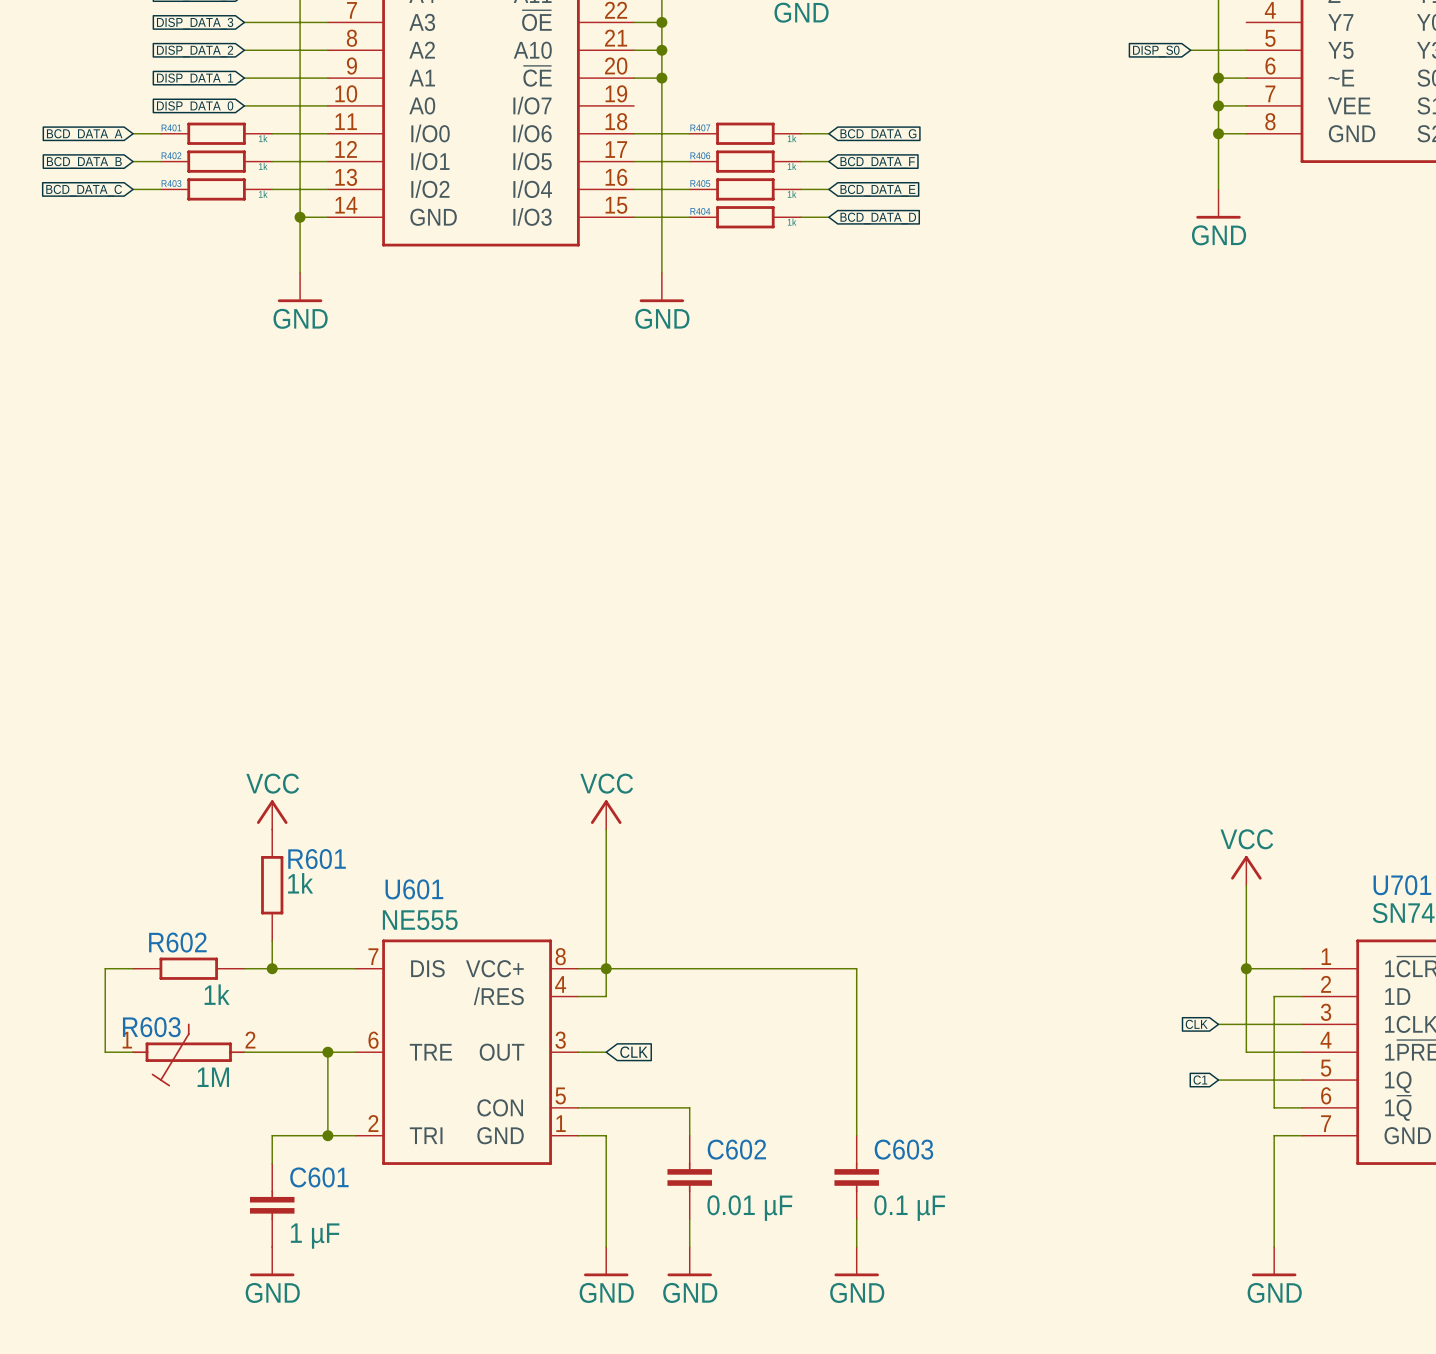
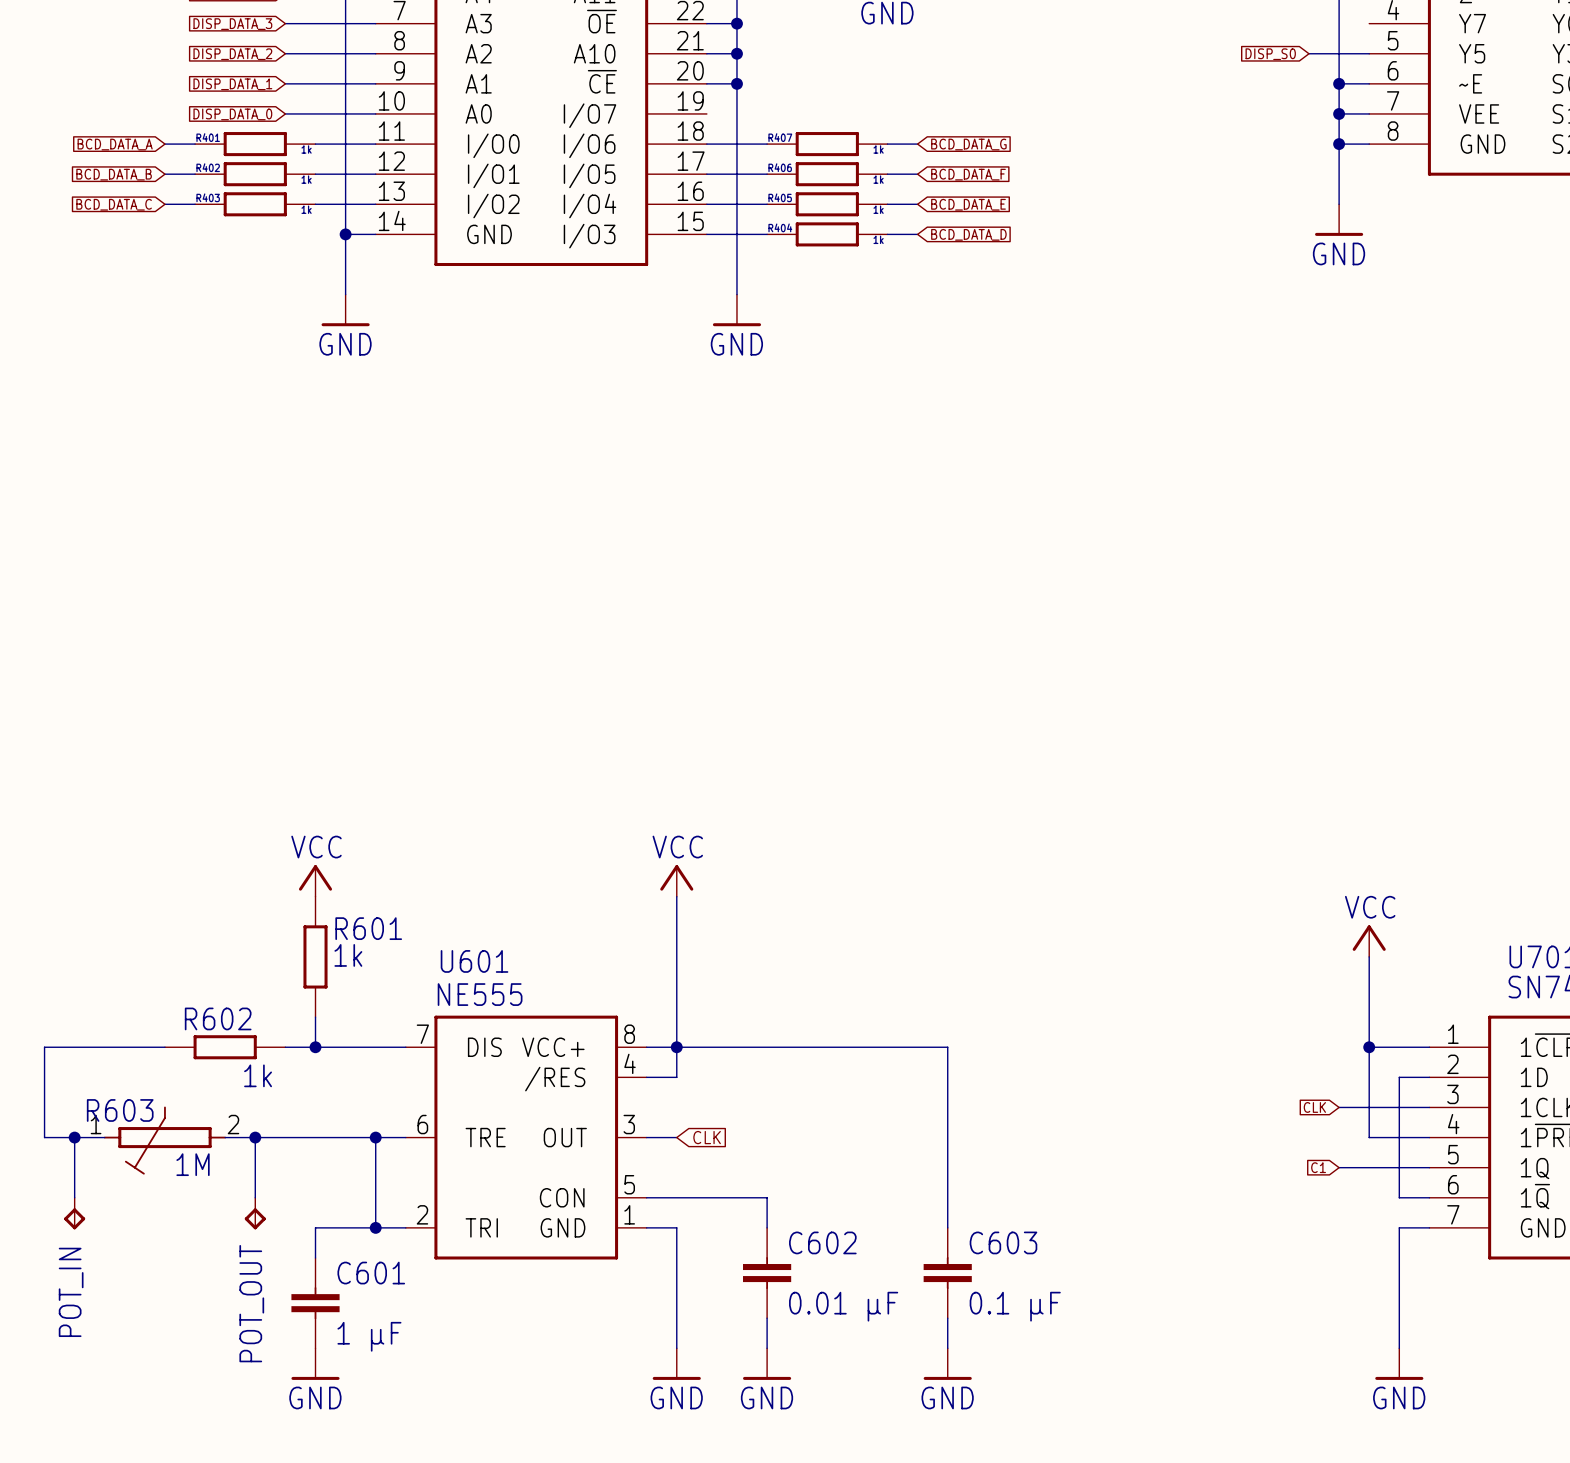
wire: (105, 968) (105, 1052) (133, 1052) -> (134, 1047) (44, 1047) (44, 1137) (104, 1137)
wire: none -> (74, 1137) (74, 1197)
junction: none -> (74, 1137)
wire: none -> (225, 1137) (285, 1137)
wire: none -> (255, 1137) (255, 1197)
junction: none -> (255, 1137)
R603 position: (188, 1054) -> (164, 1140)
POT_IN: none -> (74, 1213)
POT_OUT: none -> (255, 1213)

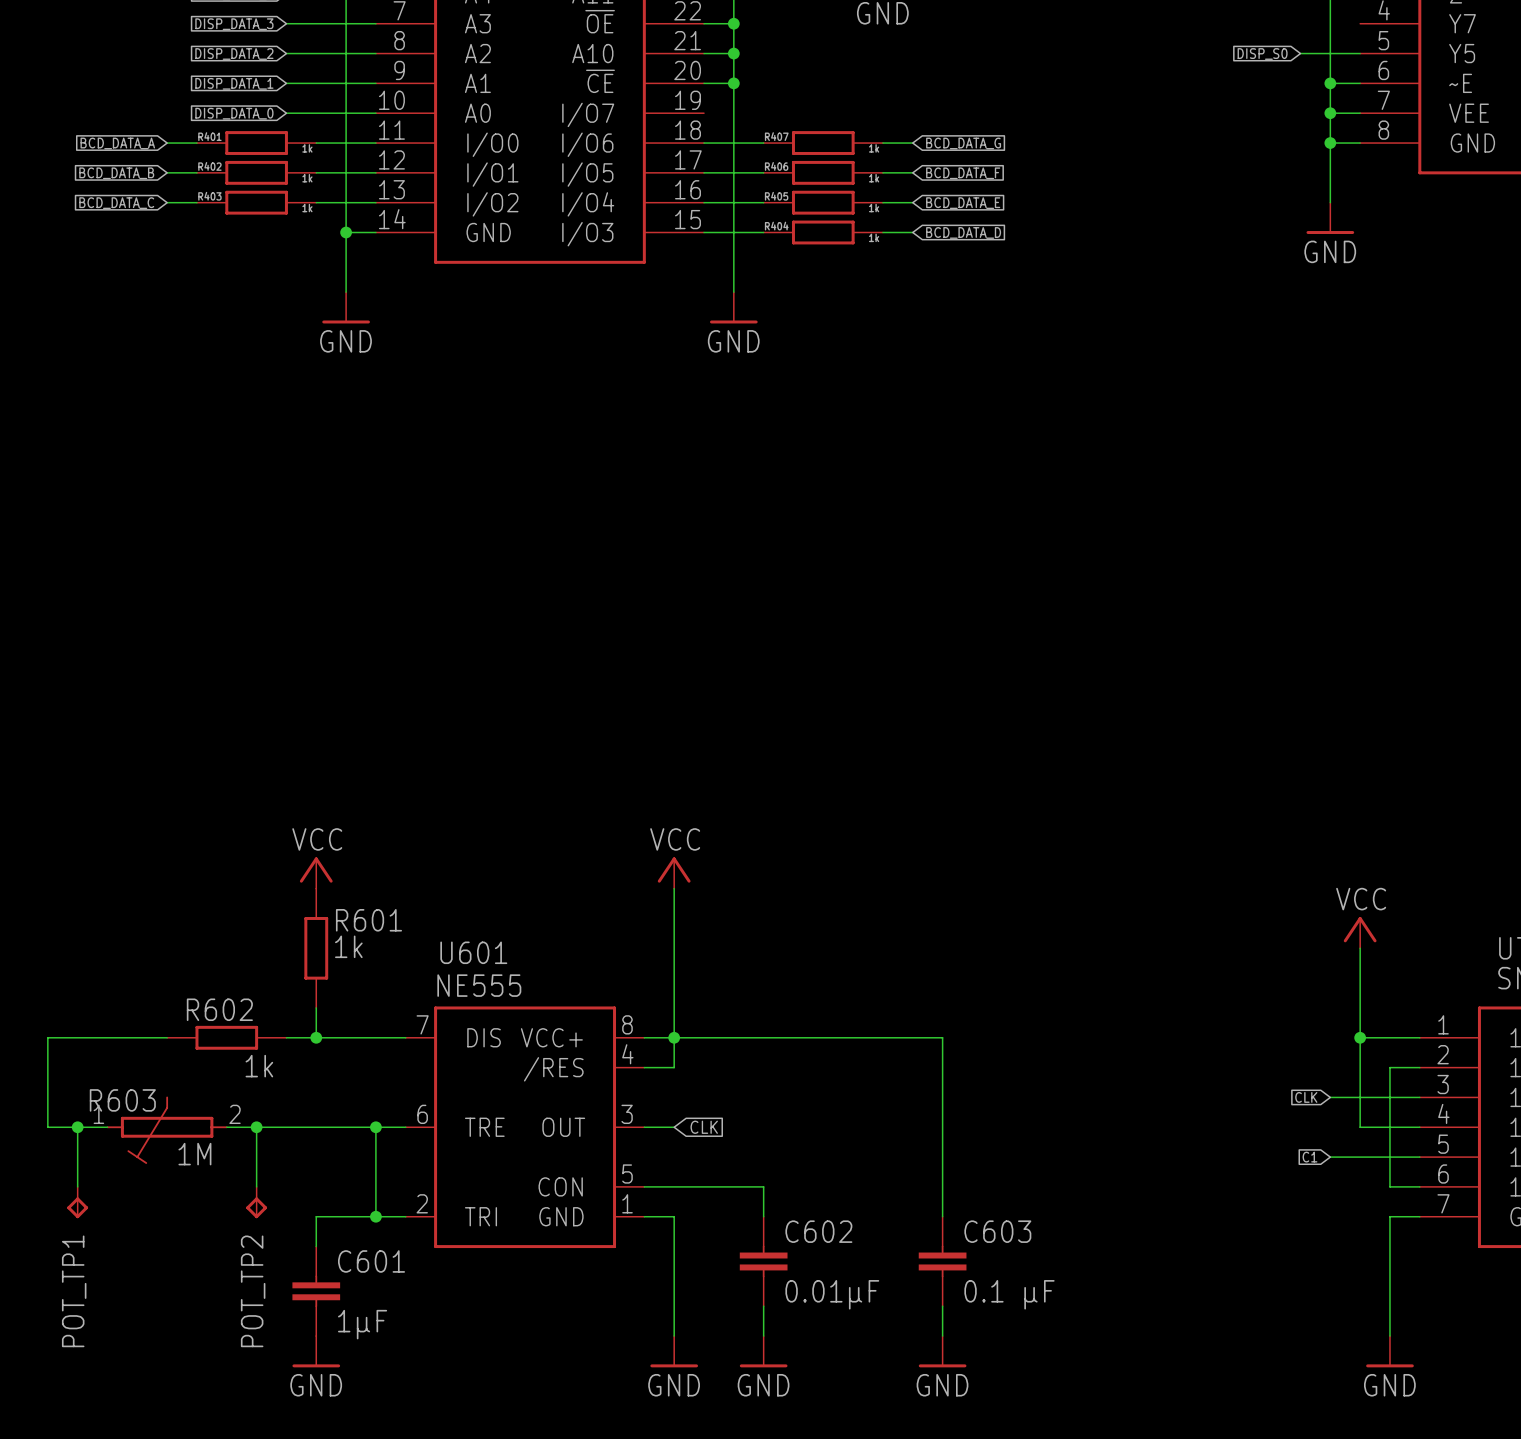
POT_IN name: POT_IN (71, 1292) -> POT_TP1 (74, 1291)
POT_OUT name: POT_OUT (251, 1303) -> POT_TP2 (253, 1291)
C602 value: 0.01 µF (843, 1306) -> 0.01µF (832, 1294)
C601 value: 1 µF (369, 1336) -> 1µF (362, 1324)

